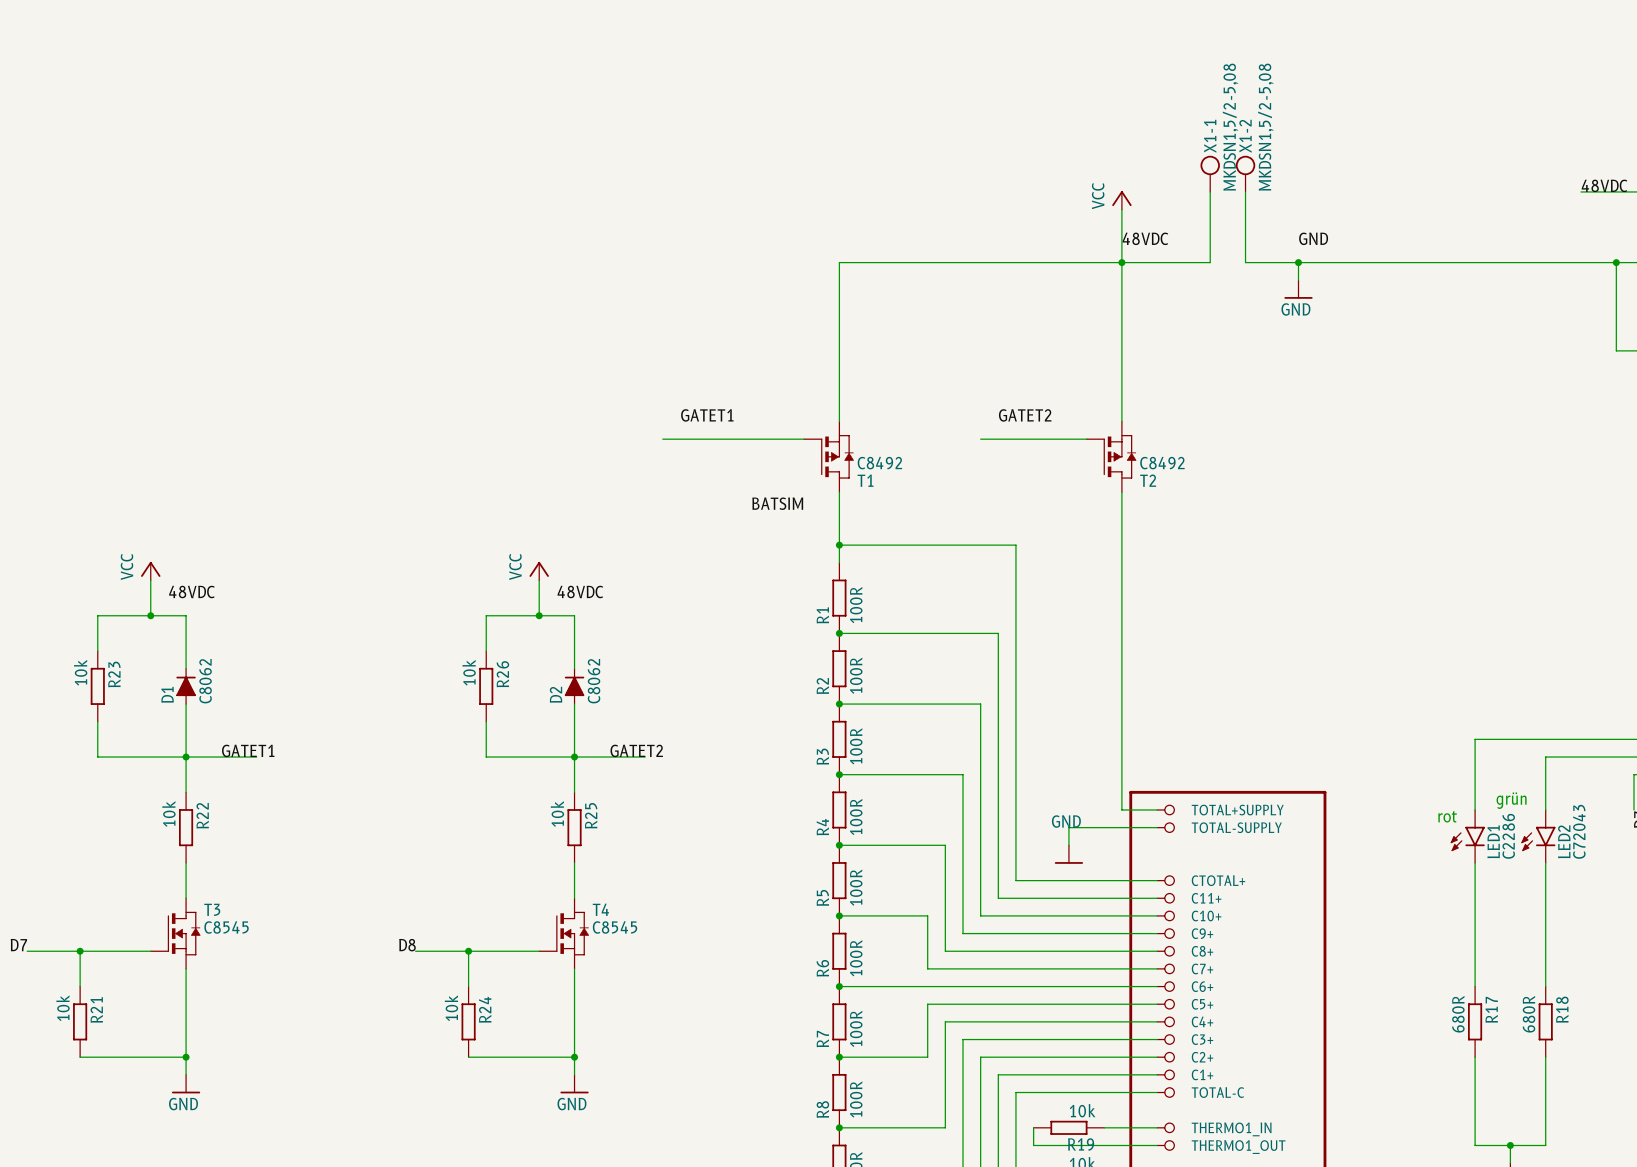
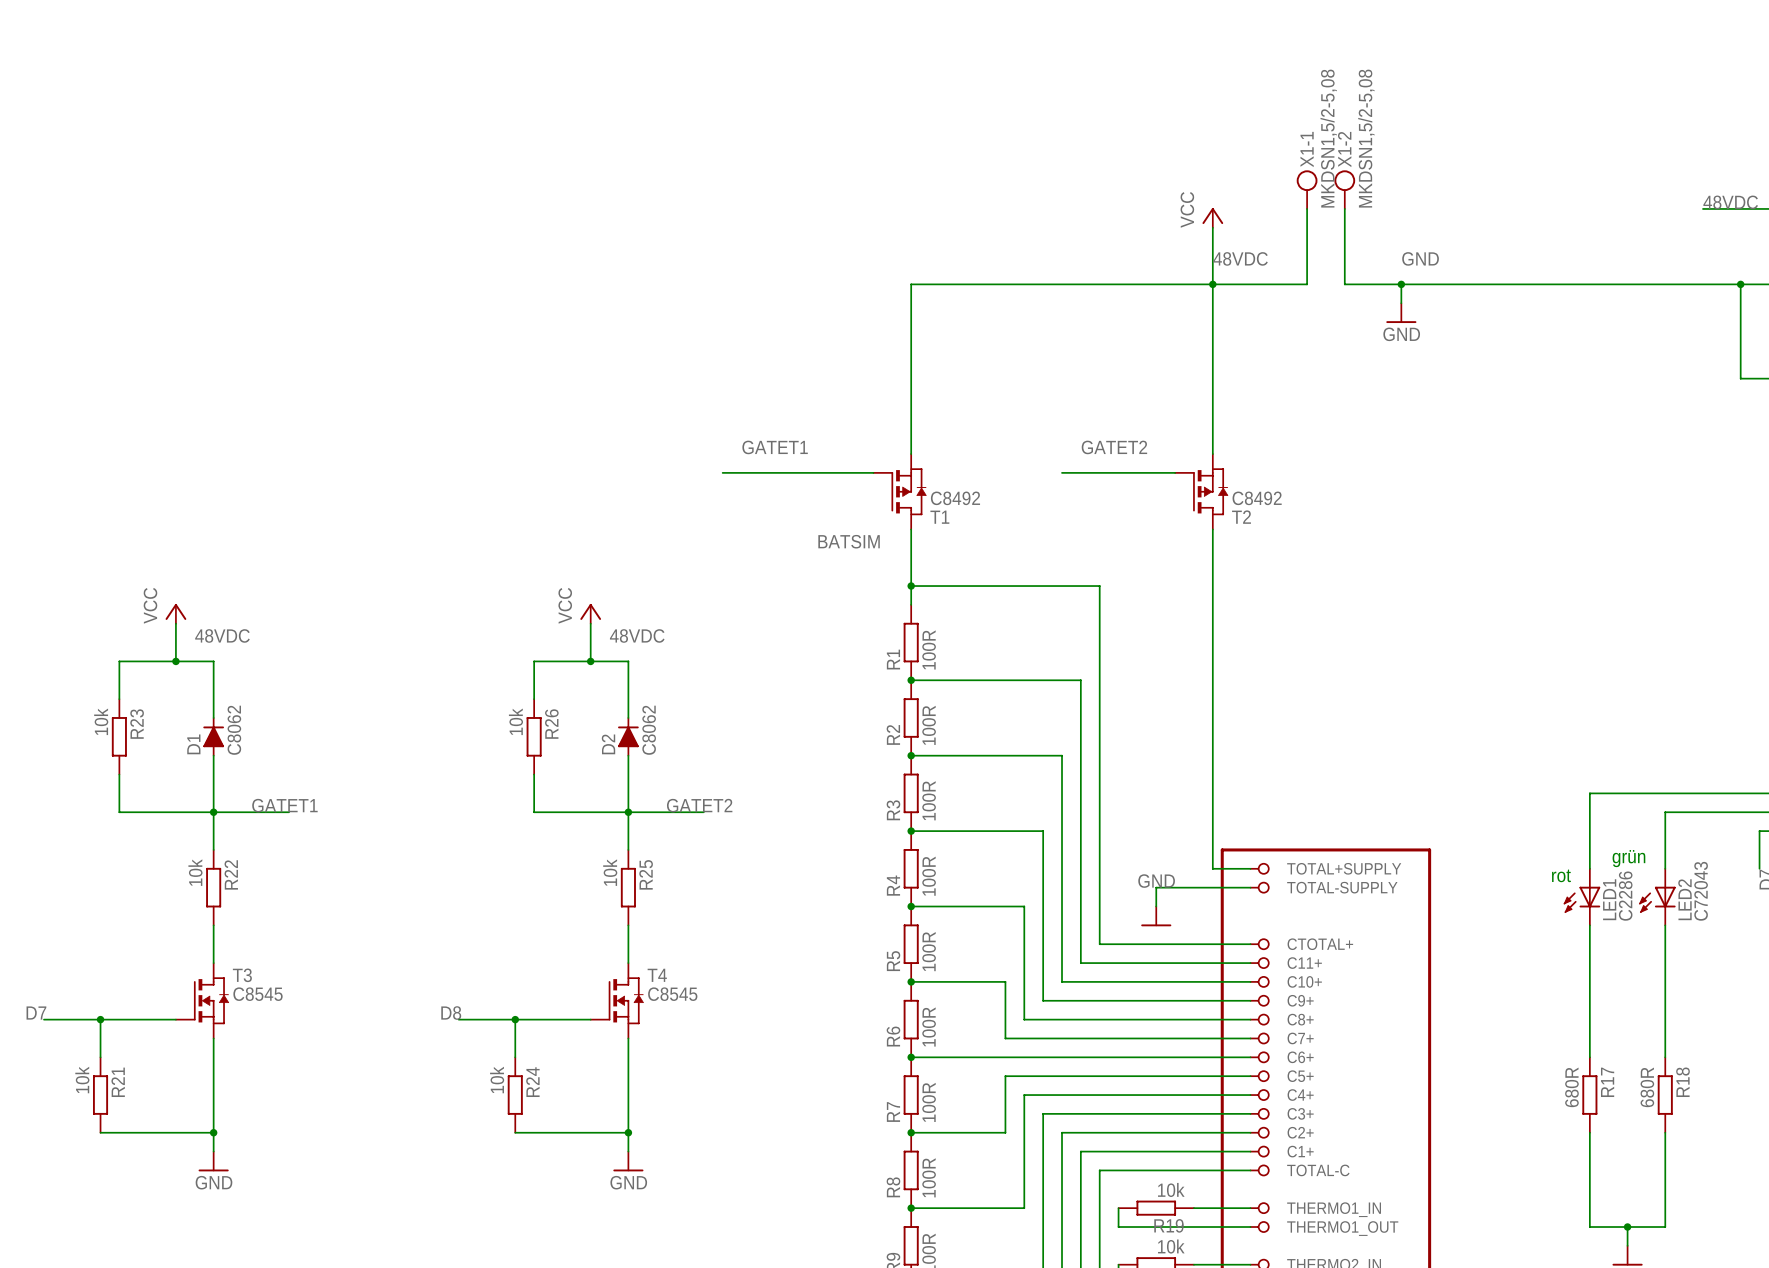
LED1 symbol: [1450, 809, 1485, 863] -> [1563, 868, 1601, 926]
LED2 symbol: [1521, 809, 1556, 863] -> [1639, 868, 1676, 926]

